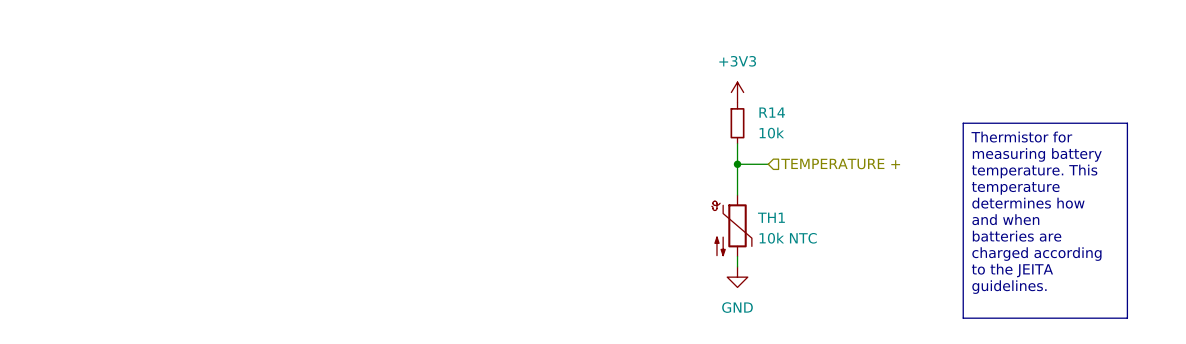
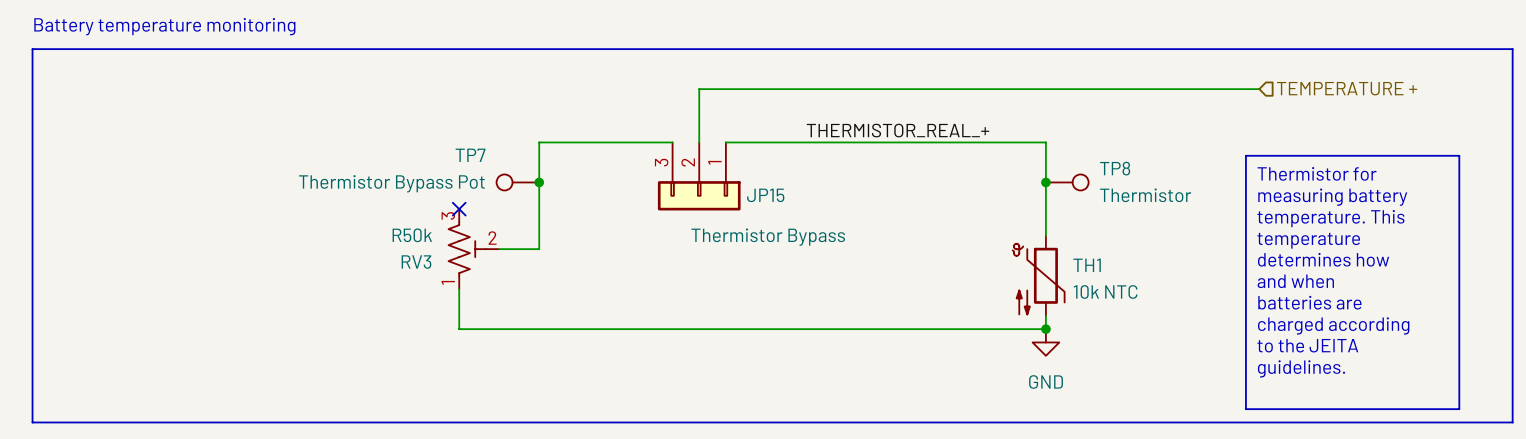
text: none -> Battery temperature monitoring (164, 26)
line: none -> (32, 49) (1512, 49) (1512, 422) (32, 422) (32, 49)
wire: none -> (1259, 89) (699, 89) (699, 142)
hierarchical label: none -> TEMPERATURE + (1347, 88)
power symbol: +3V3 (737, 92) -> none
label: none -> THERMISTOR_REAL_+ (897, 130)
wire: none -> (672, 142) (539, 142) (539, 249) (499, 249)
wire: none -> (725, 142) (1045, 142) (1045, 235)
R14: 10k (737, 123) -> none
JP15: none -> (699, 176)
TP7: none -> Thermistor Bypass Pot (517, 182)
junction: none -> (539, 182)
wire: (737, 143) (737, 195) -> none
junction: none -> (1045, 182)
TP8: none -> Thermistor (1067, 182)
no-connect mark: none -> (459, 209)
wire: (737, 164) (768, 164) -> none
junction: (737, 164) -> none
hierarchical label: TEMPERATURE + (840, 164) -> none
RV3: none -> R50k (473, 249)
wire: none -> (459, 289) (459, 329) (1045, 329) (1045, 315)
TH1 position: (731, 225) -> (1038, 275)
wire: (737, 256) (737, 266) -> none
junction: none -> (1045, 329)
power symbol position: GND (737, 277) -> GND (1045, 342)

